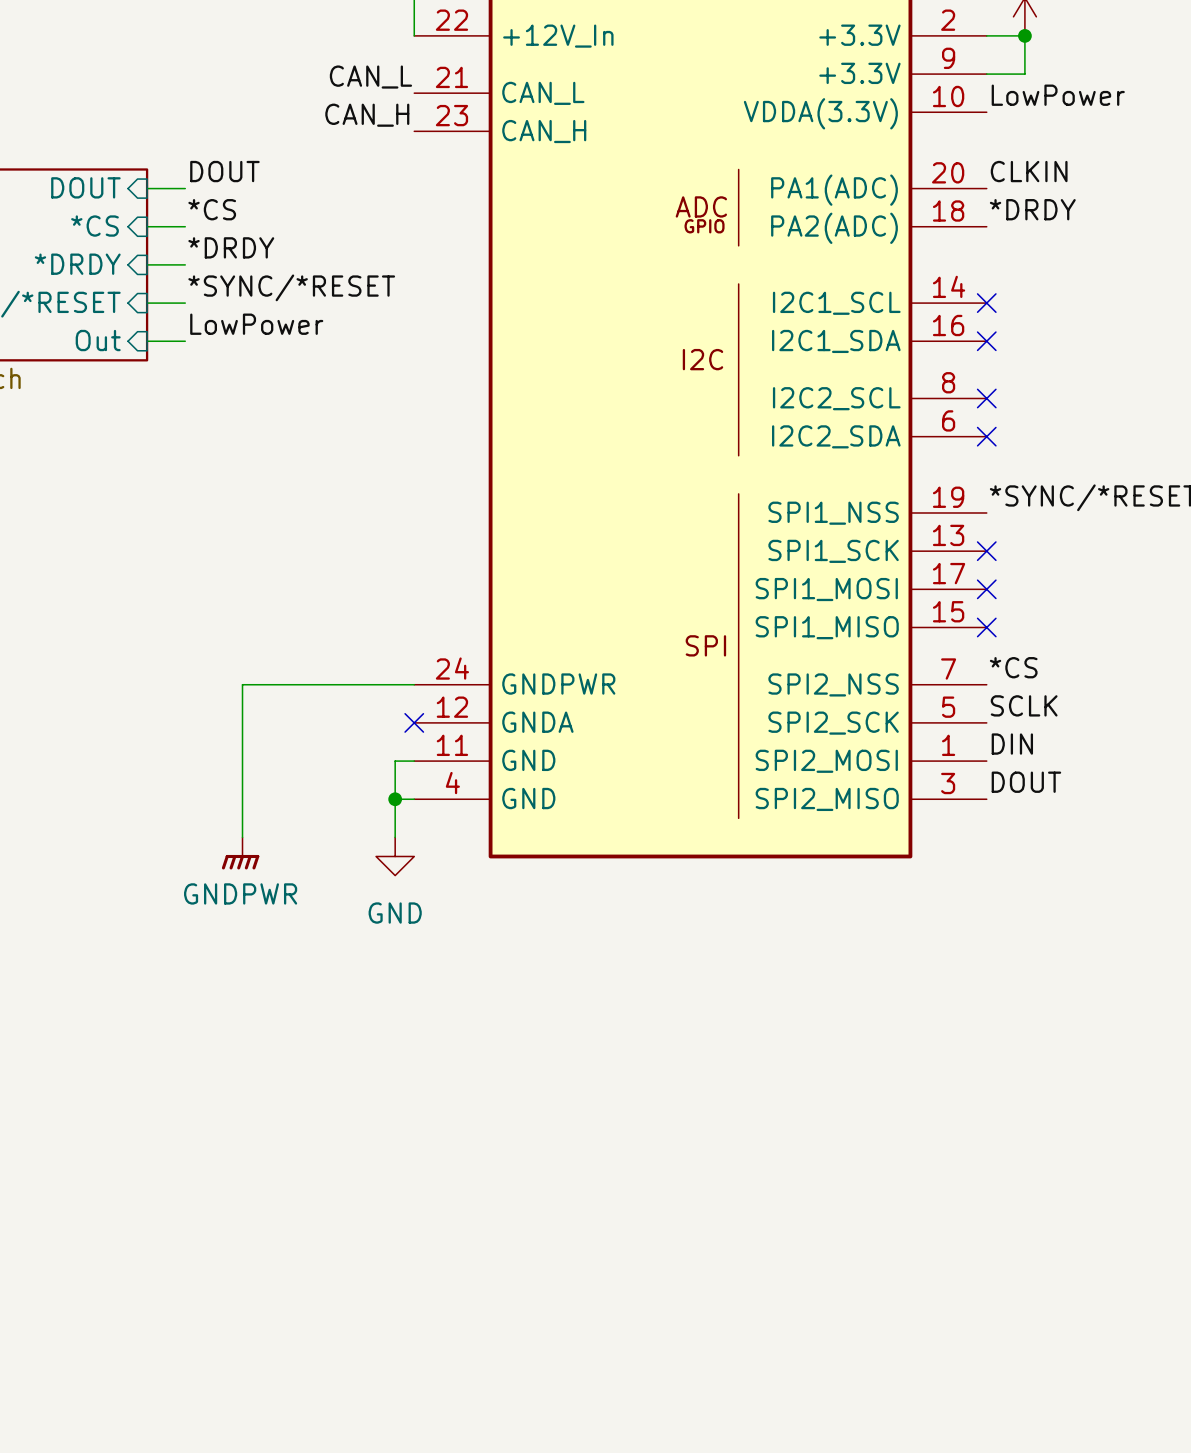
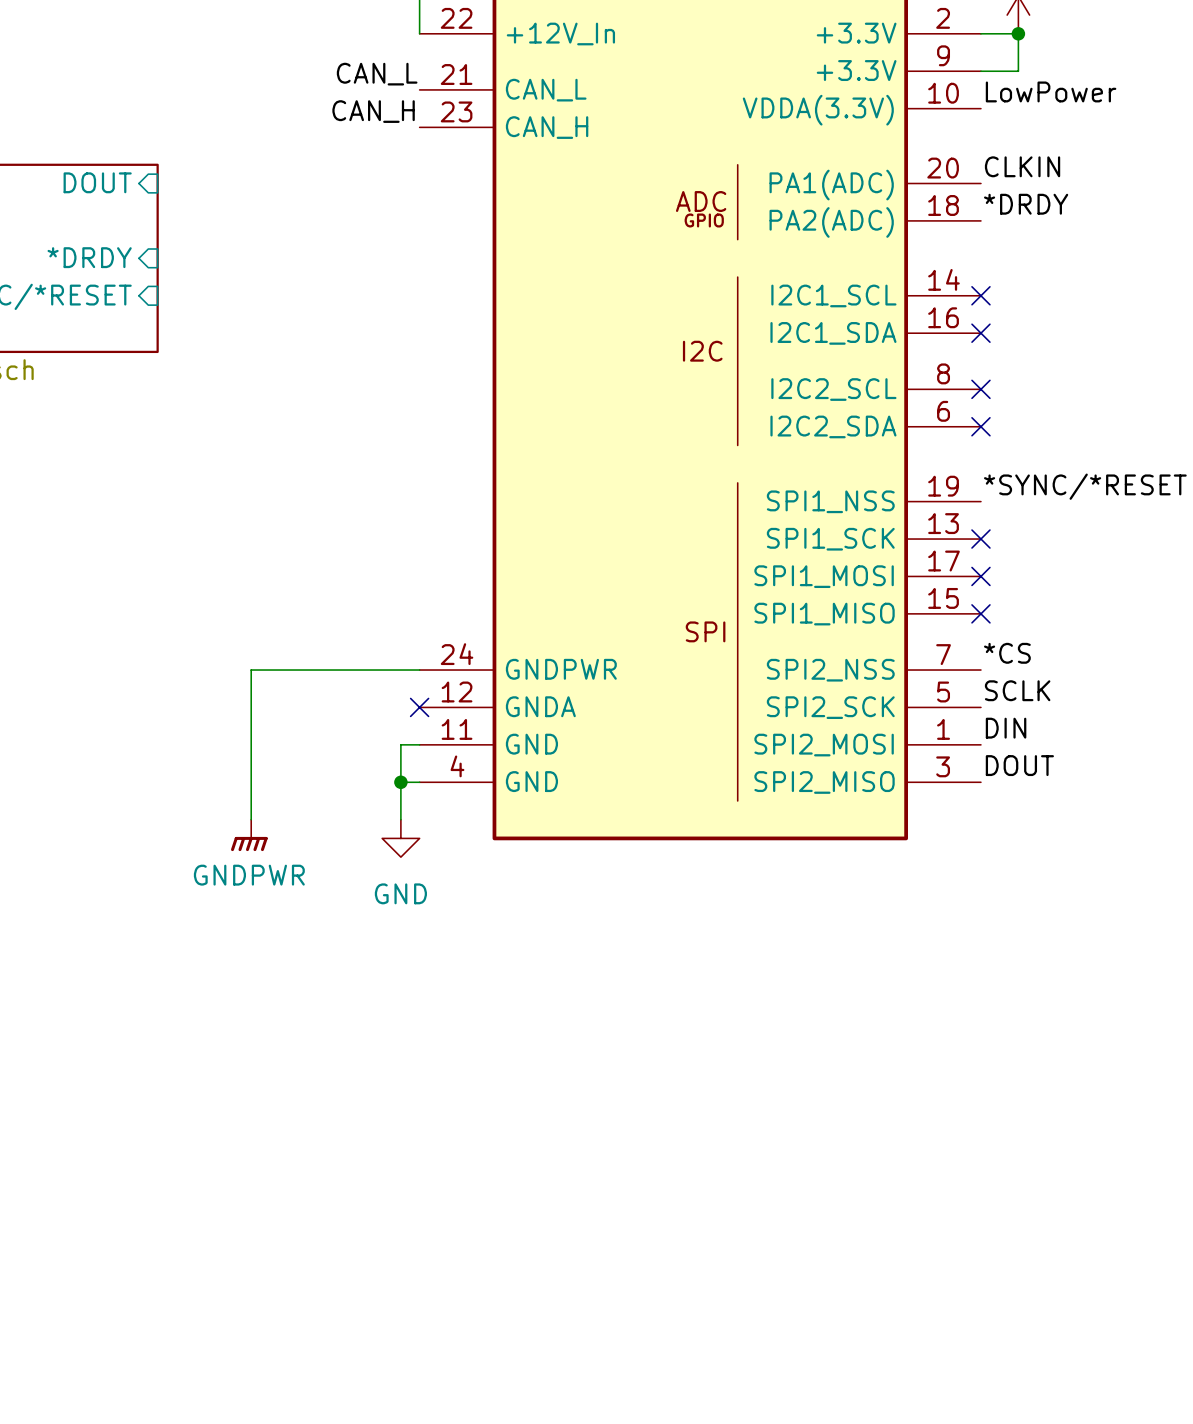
label: DOUT (224, 171) -> none
wire: (147, 188) (185, 188) -> none
label: *CS (212, 209) -> none
sheet pin: *CS (94, 226) -> none
wire: (147, 226) (185, 226) -> none
label: *DRDY (231, 247) -> none
wire: (147, 264) (185, 264) -> none
label: *SYNC/*RESET (291, 287) -> none
wire: (147, 303) (185, 303) -> none
label: LowPower (256, 324) -> none
sheet pin: Out (98, 340) -> none
wire: (147, 341) (185, 341) -> none

